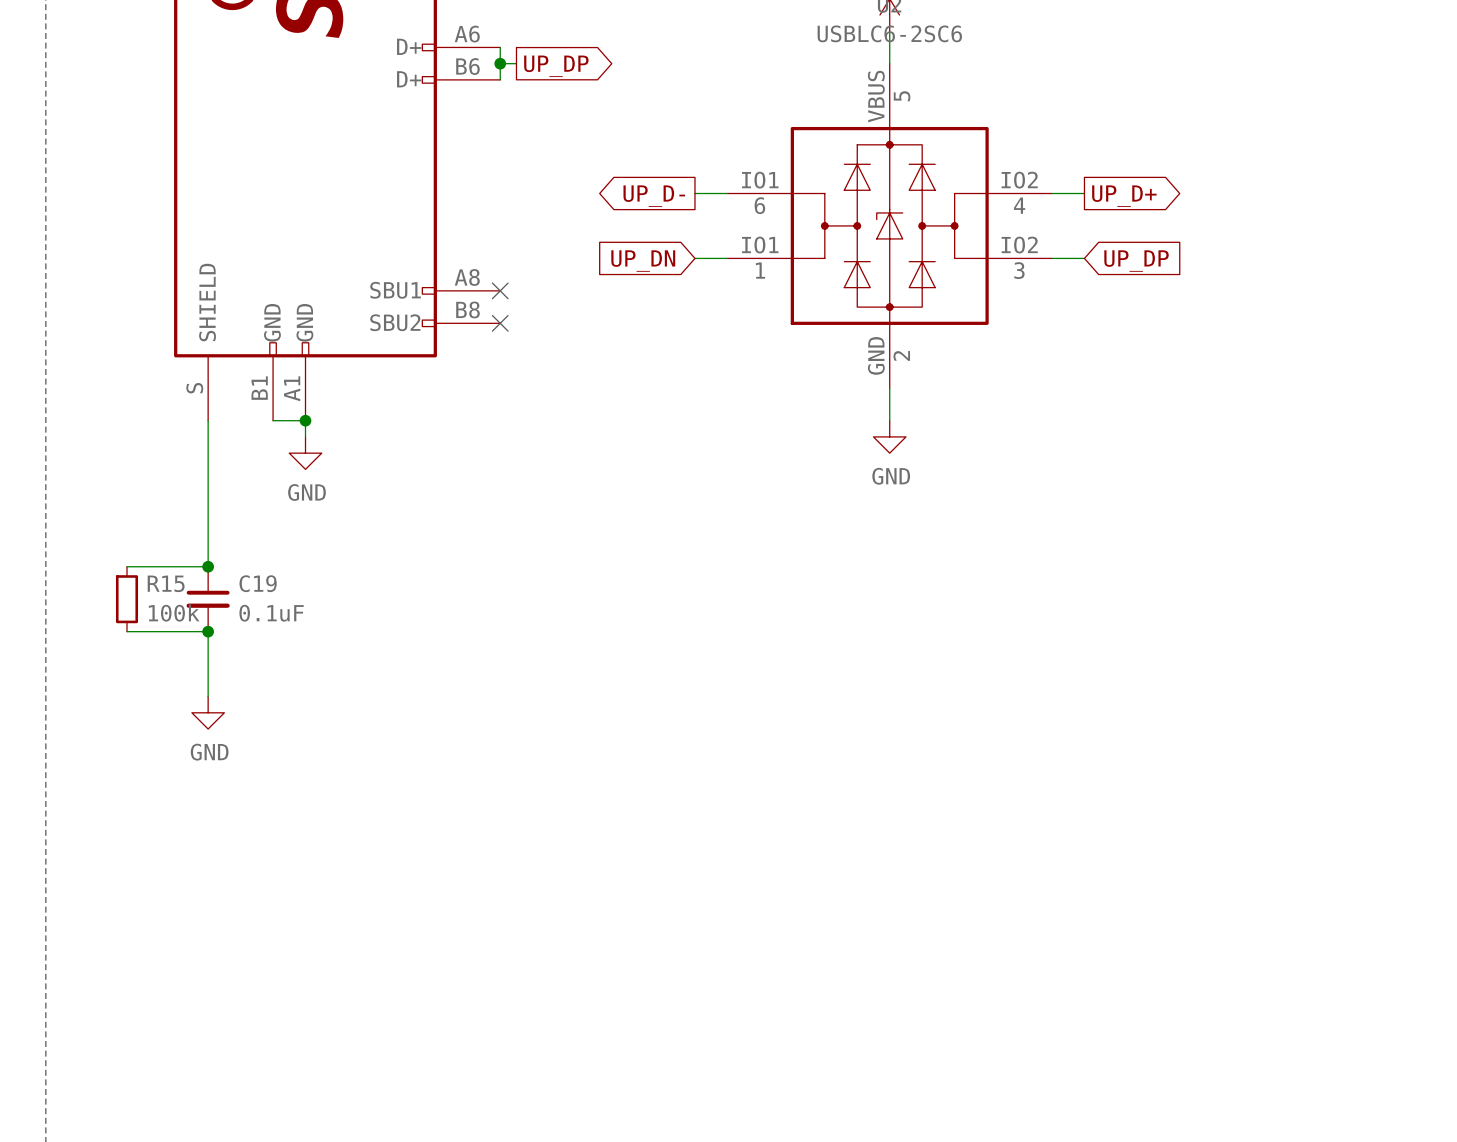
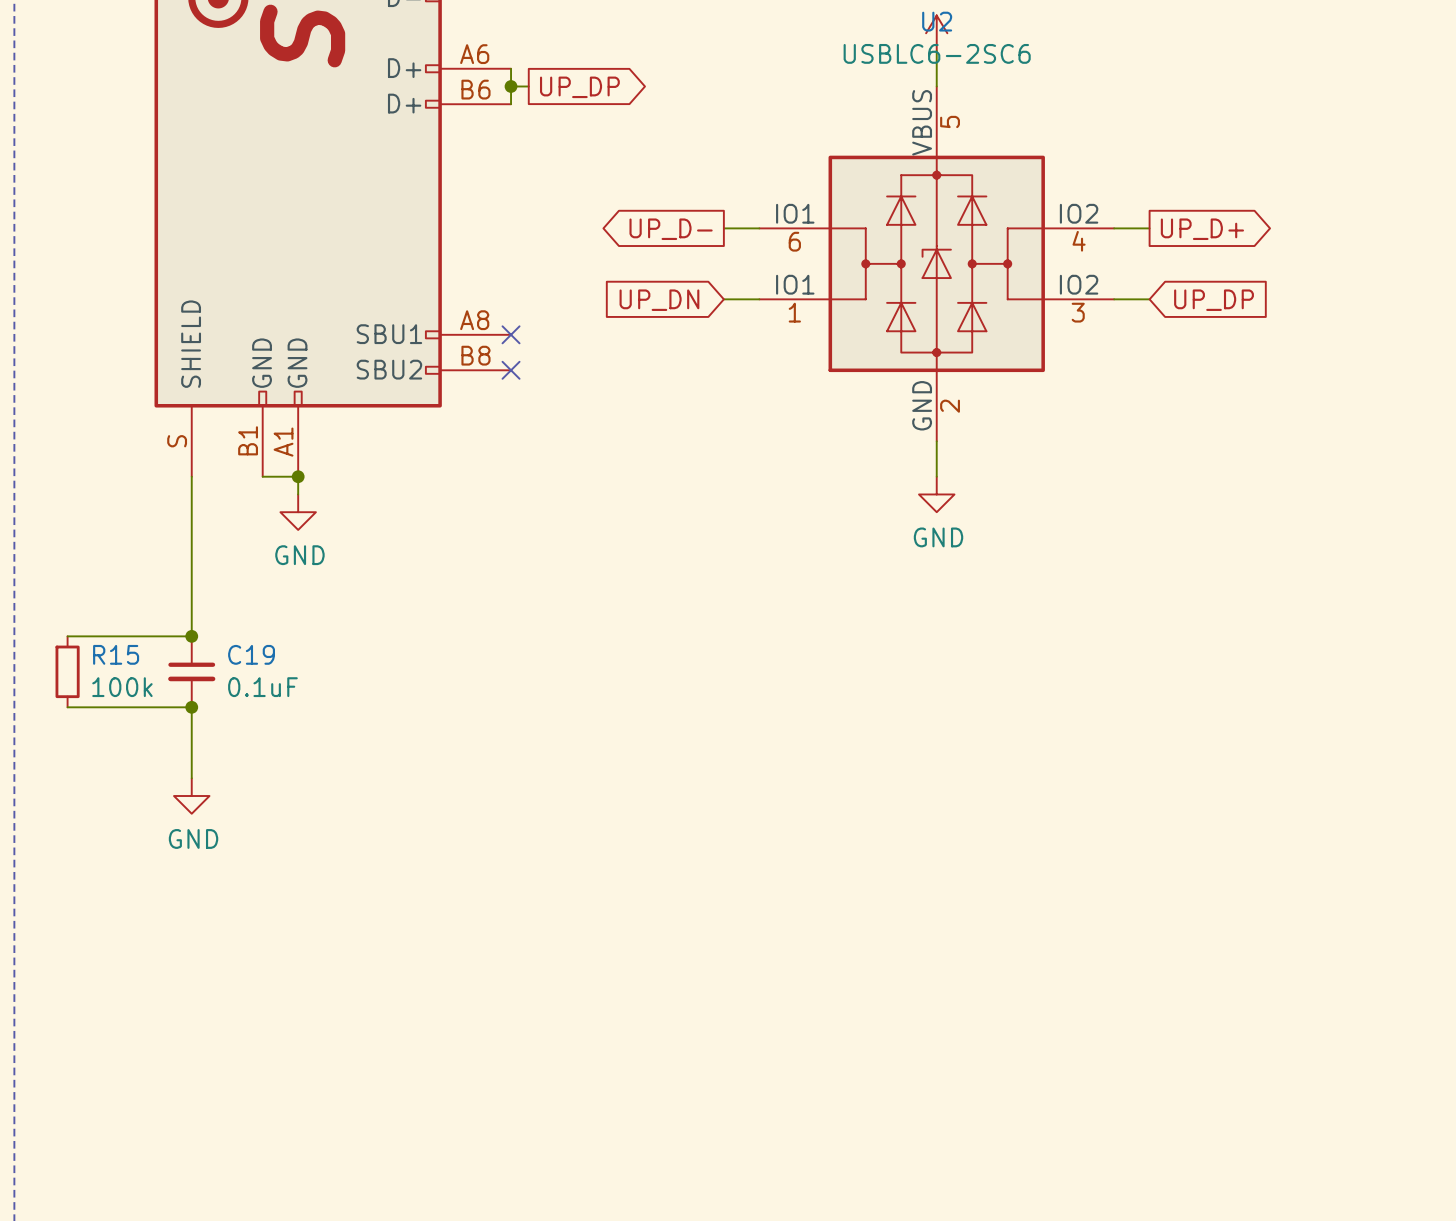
wire: none -> (67, 636) (103, 636)
R15 position: (126, 599) -> (67, 671)
wire: none -> (67, 707) (103, 707)

